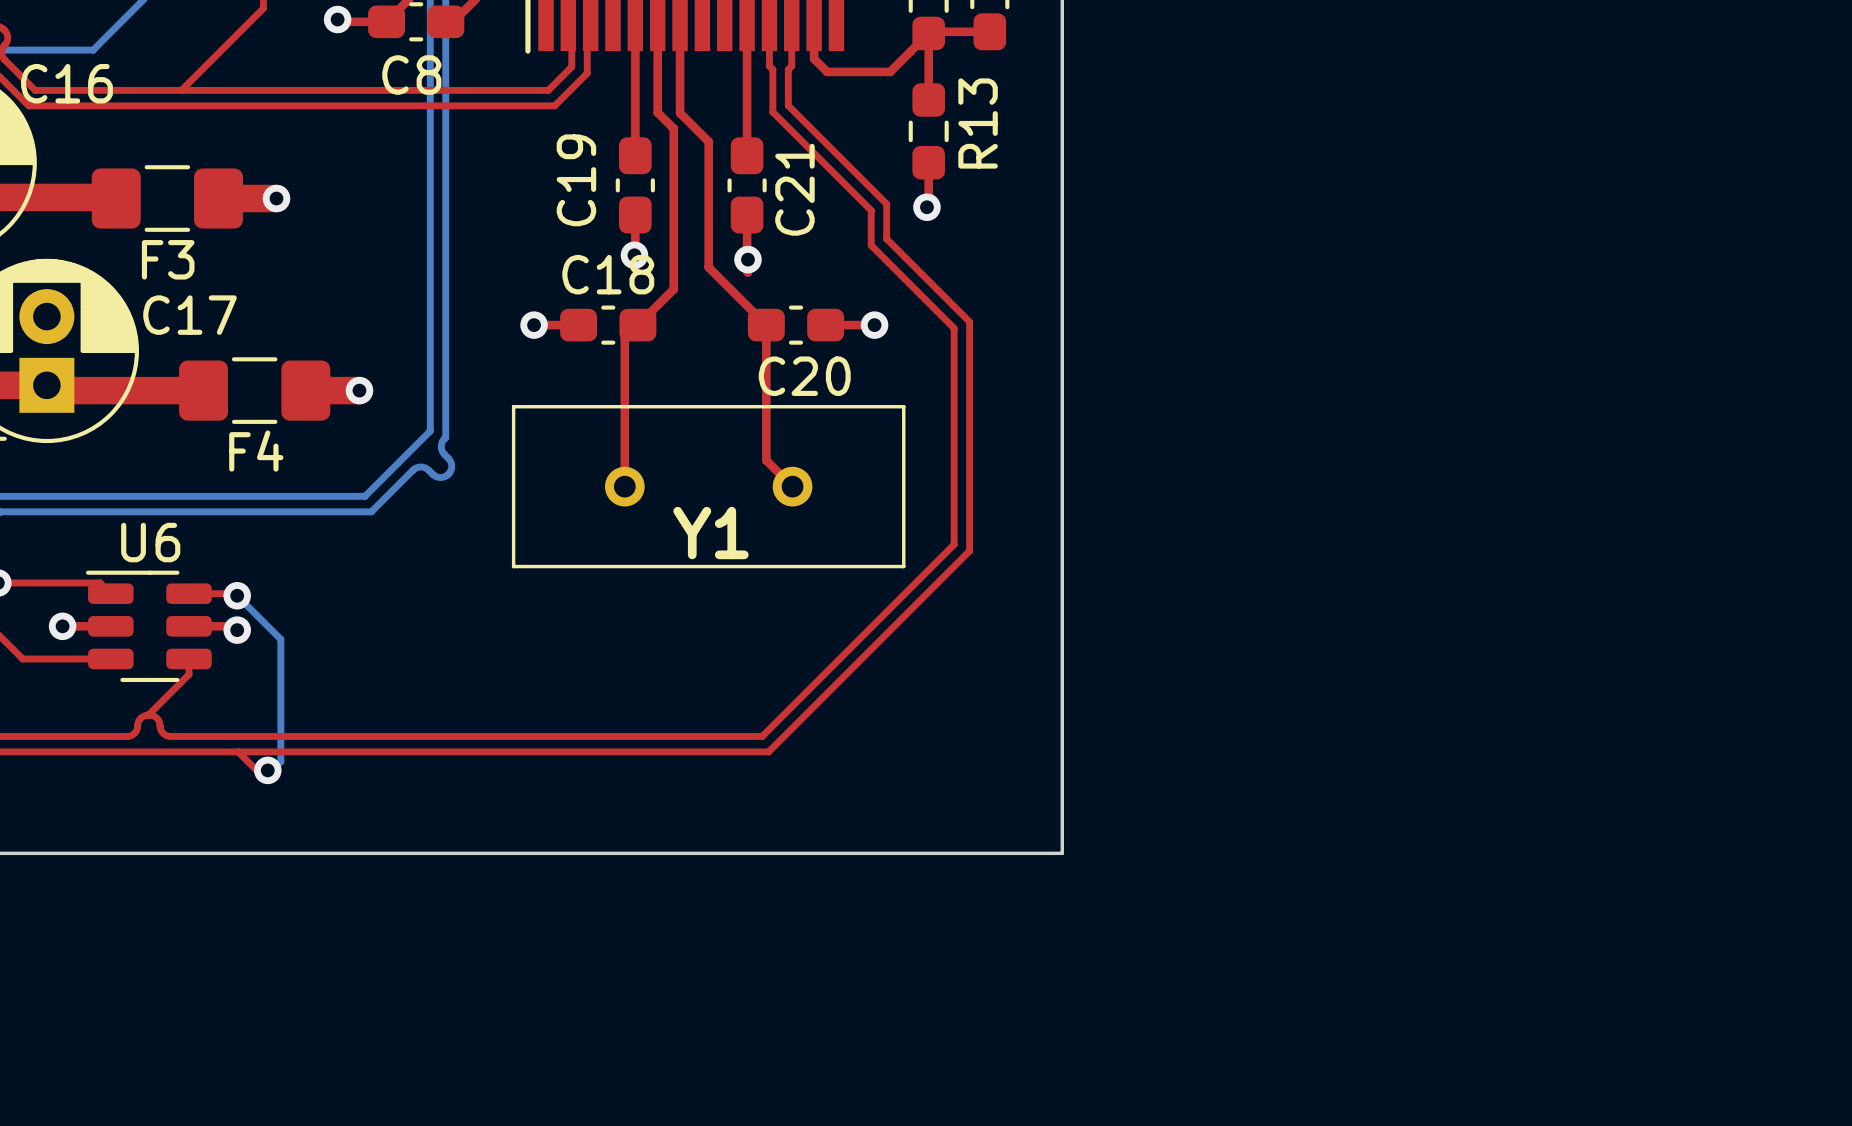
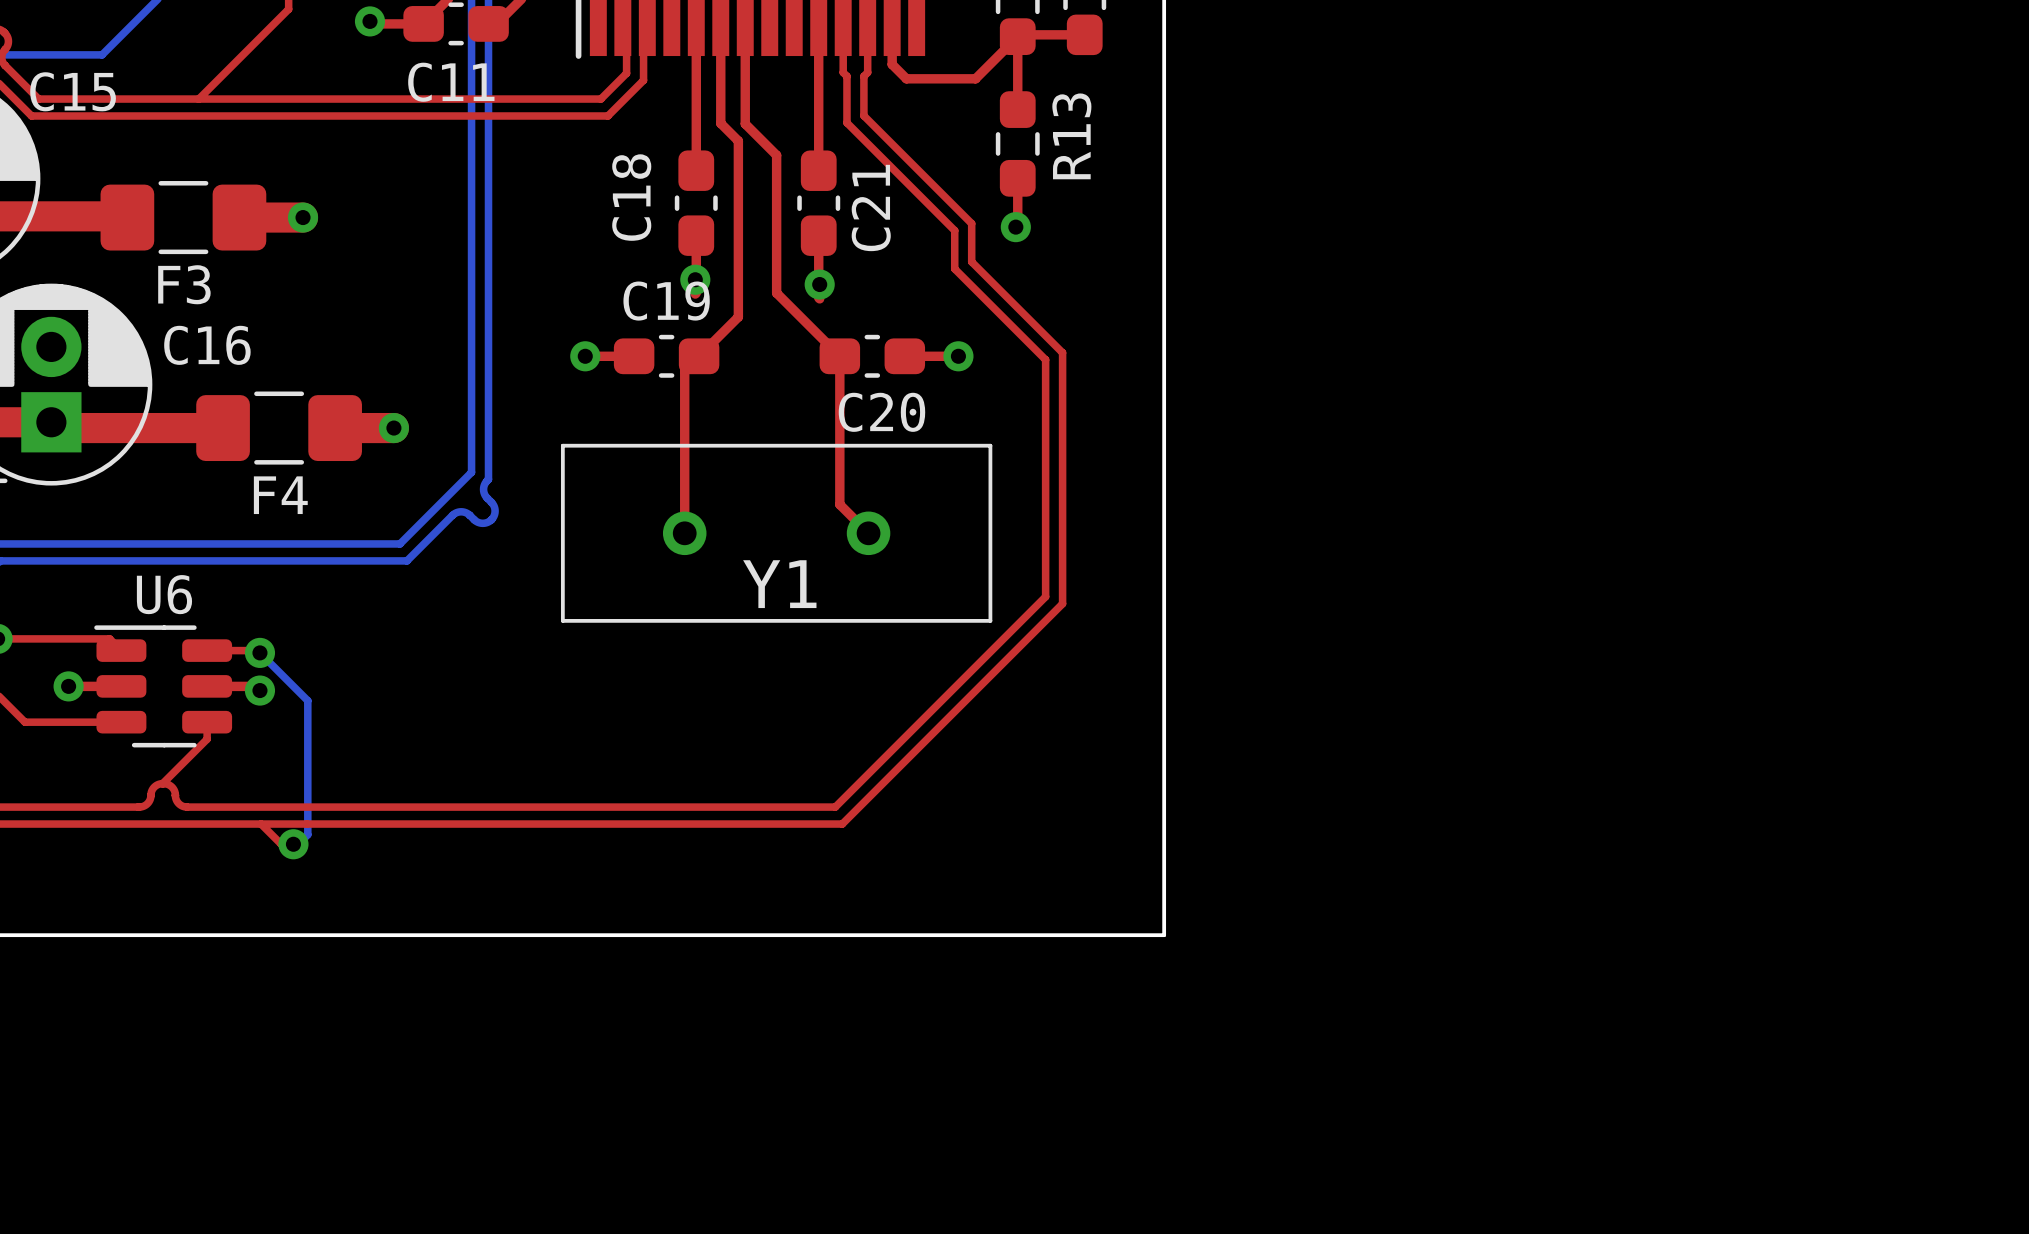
C8 name: C8 (411, 75) -> C11 (451, 82)
C16 name: C16 (66, 83) -> C15 (73, 91)
C19 name: C19 (576, 180) -> C18 (631, 197)
C18 name: C18 (608, 274) -> C19 (666, 301)
C17 name: C17 (190, 315) -> C16 (207, 345)

